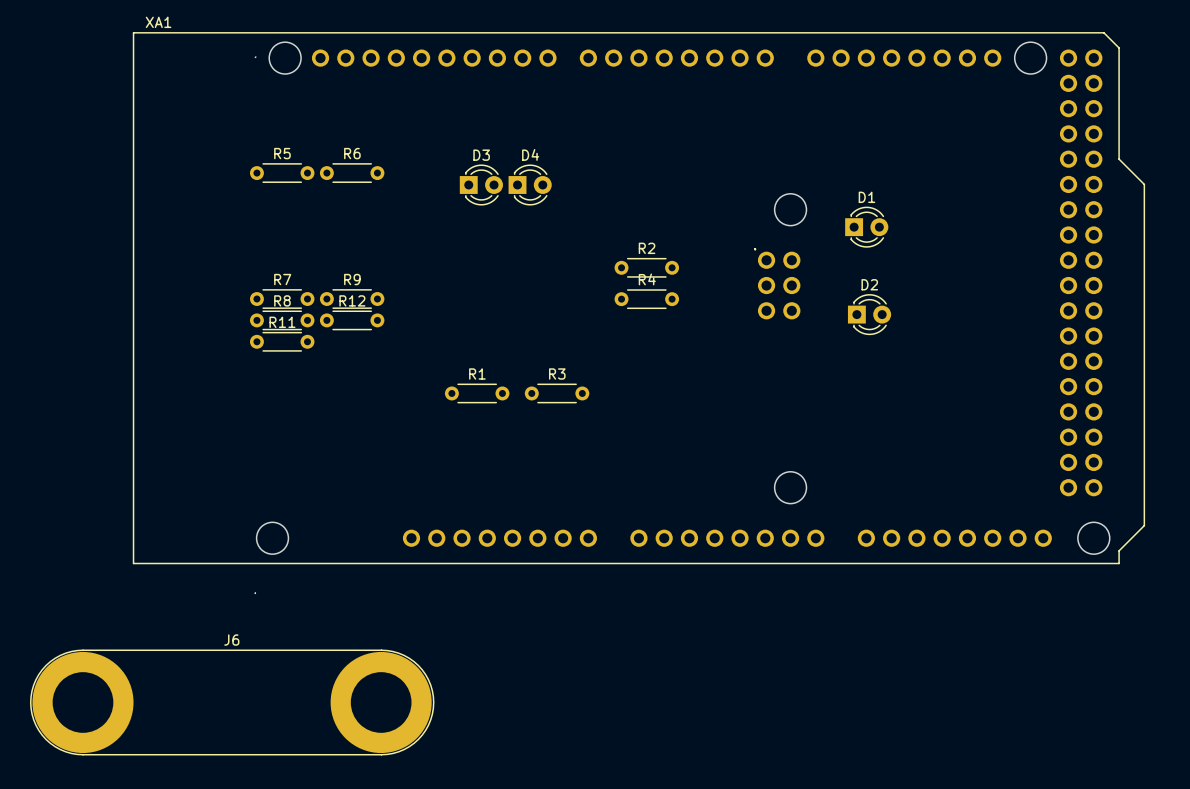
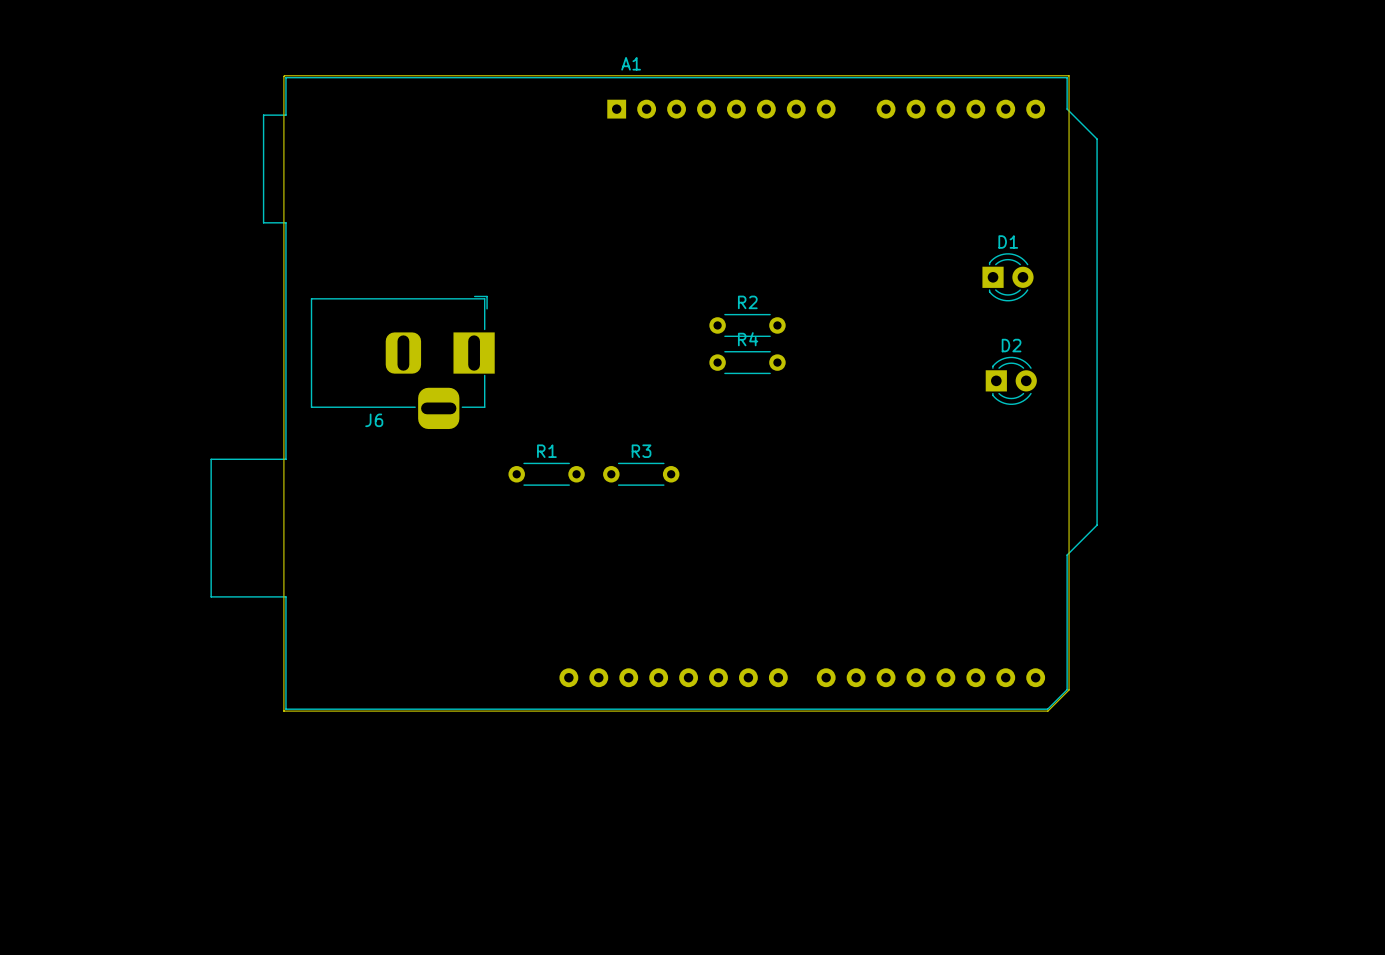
board edge: none -> (284, 75) (1069, 75) (1069, 690) (1047, 711) (283, 711)
board edge: none -> (283, 76) (283, 710)
R5: (282, 173) -> none
R6: (352, 173) -> none
D3: (481, 184) -> none
D4: (530, 184) -> none
XA1: (638, 298) -> none
R7: (282, 299) -> none
R9: (352, 299) -> none
R8: (282, 320) -> none
R12: (352, 320) -> none
A1: none -> (654, 393)
R11: (282, 341) -> none
J6 name position: J6 (231, 640) -> J6 (374, 420)
J6 footprint: [30, 649, 435, 756] -> [310, 295, 495, 430]

